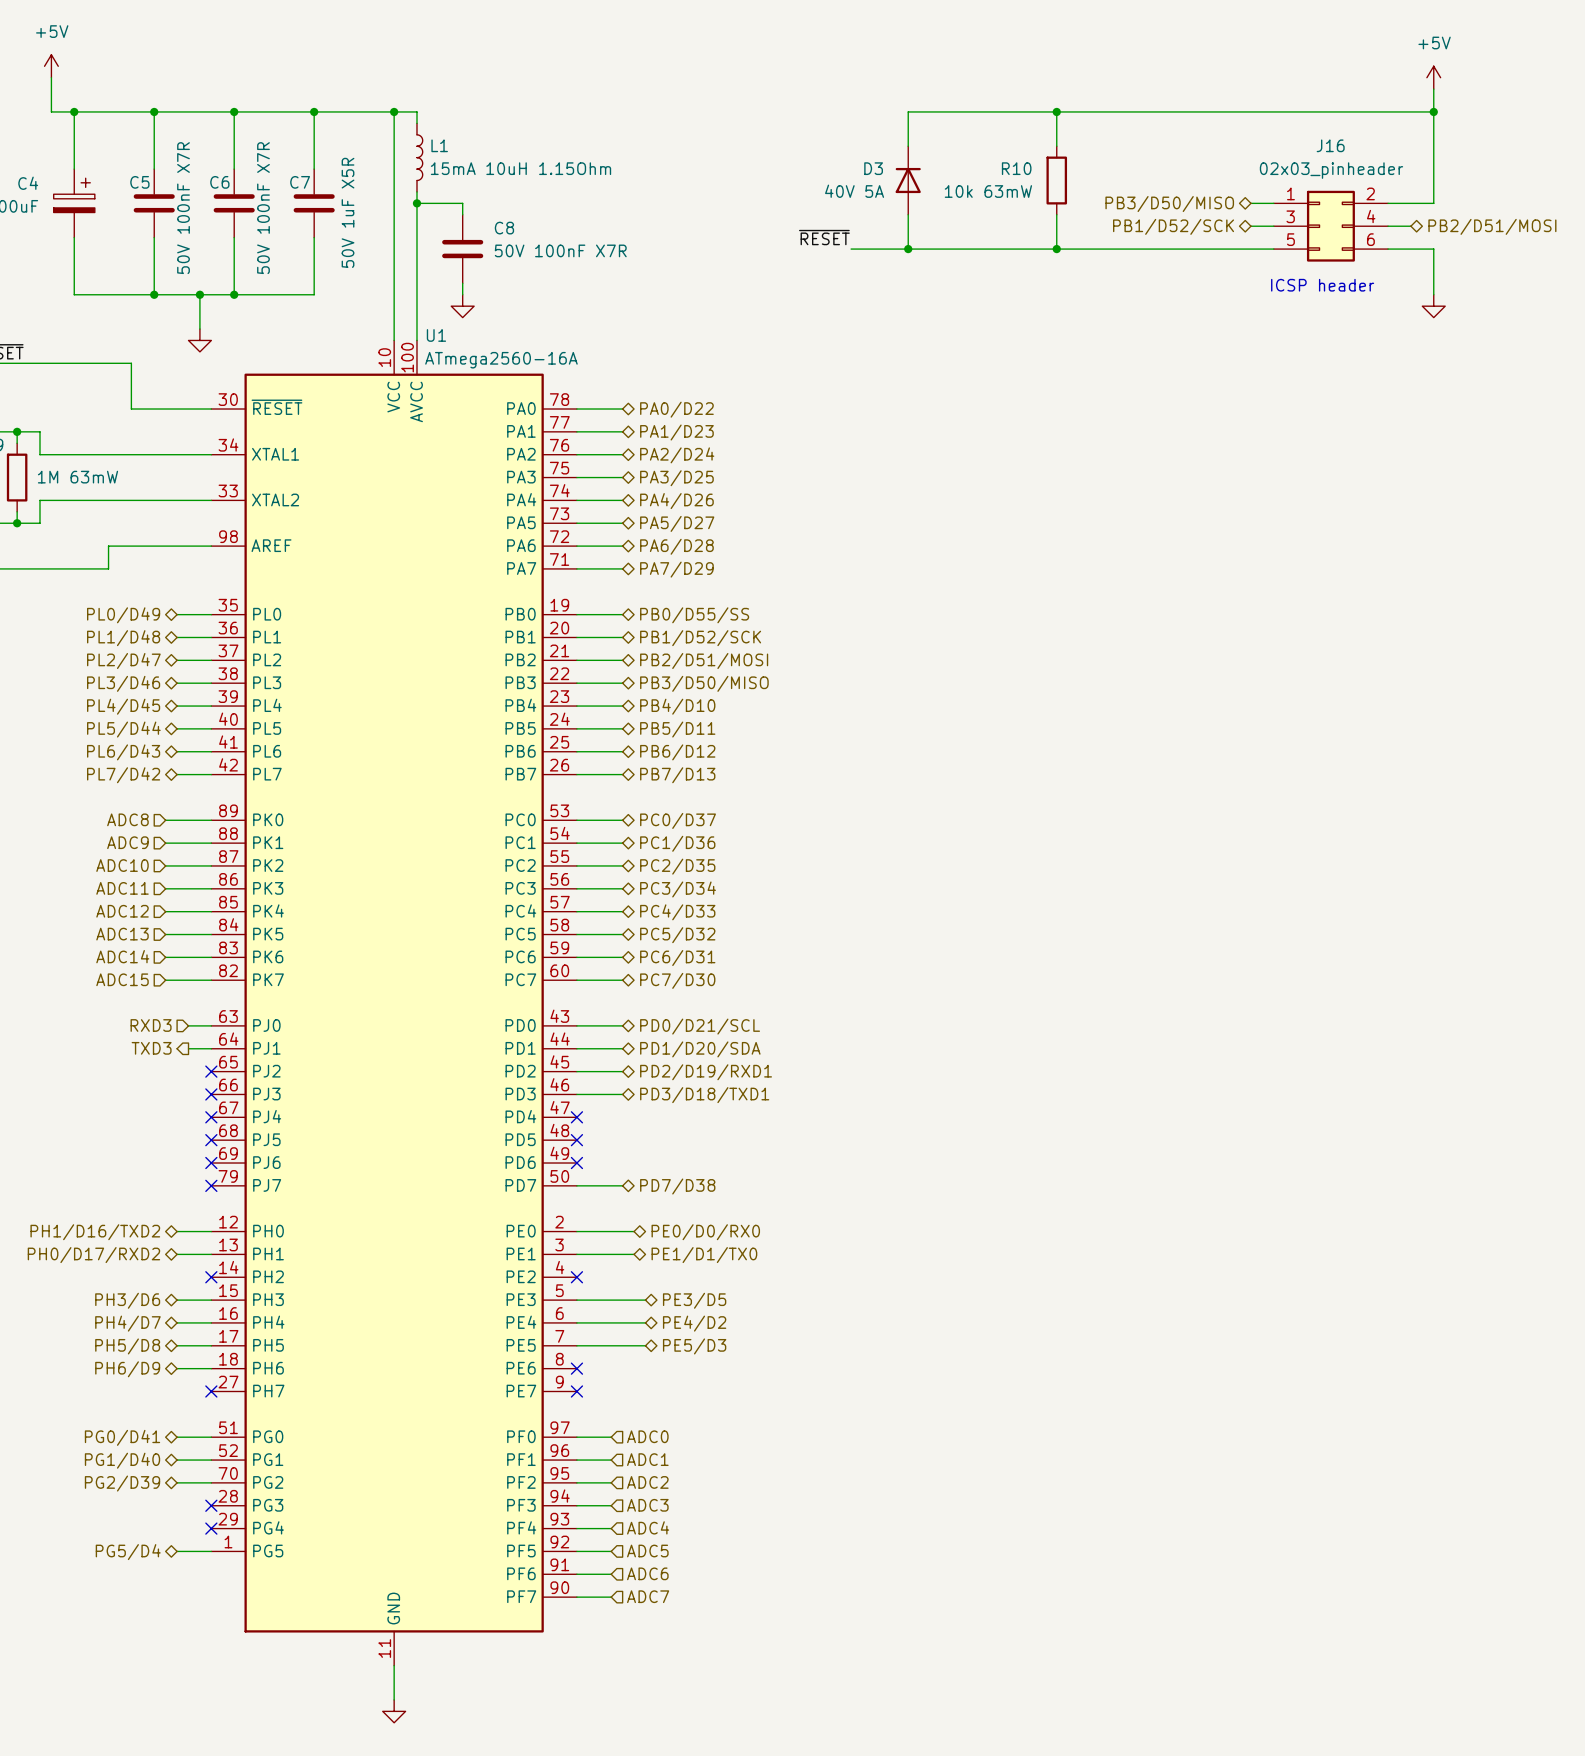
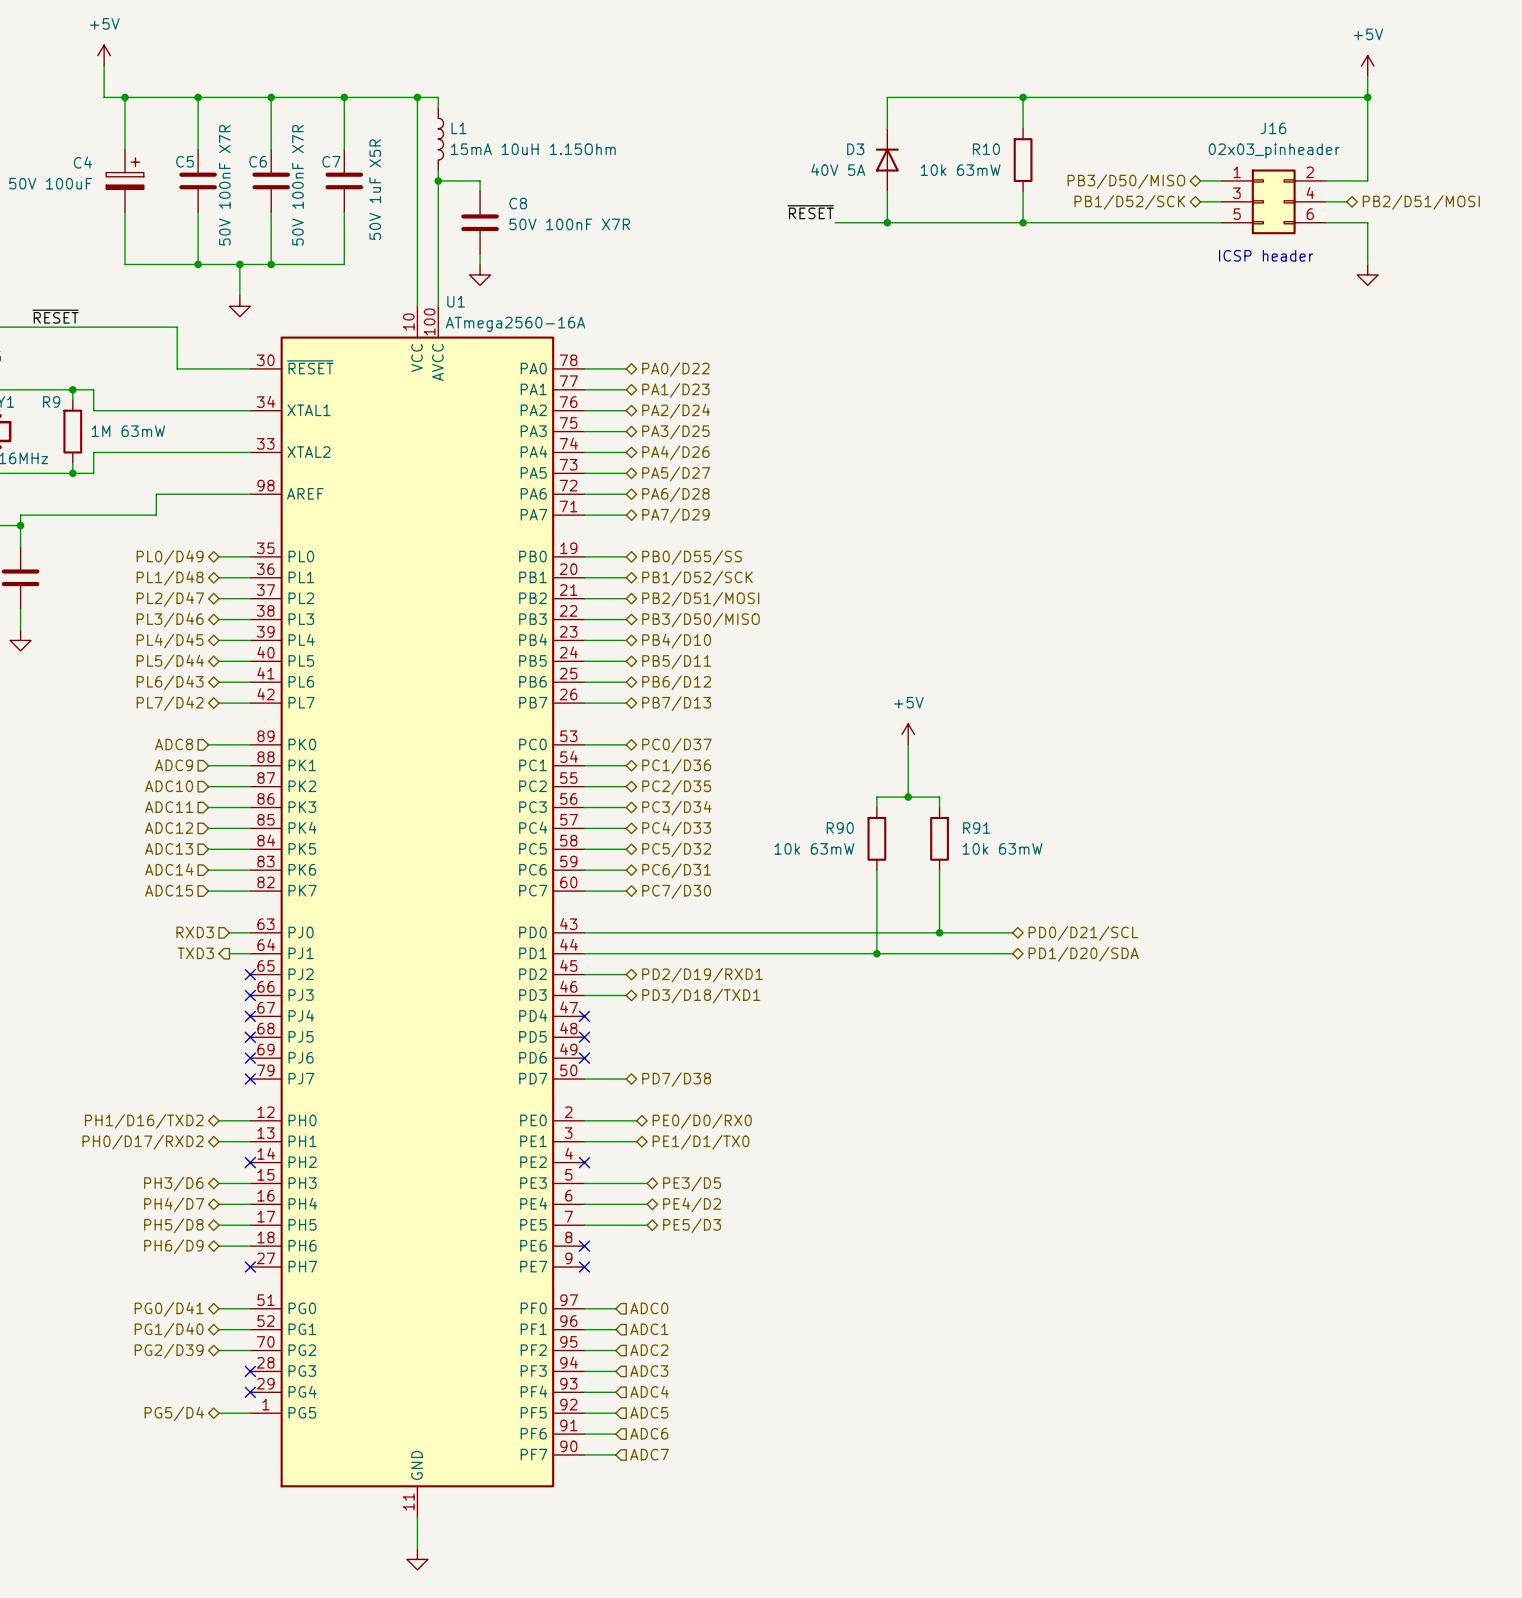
power symbol: none -> +5V (908, 734)
wire: none -> (908, 744) (908, 797)
junction: none -> (908, 797)
wire: none -> (876, 807) (876, 797) (939, 797) (939, 807)
R90: none -> 10k 63mW (876, 838)
R91: none -> 10k 63mW (939, 838)
wire: none -> (876, 870) (876, 953)
wire: none -> (939, 870) (939, 932)
wire: none -> (626, 932) (1012, 932)
junction: none -> (939, 932)
hierarchical label: PD0/D21/SCL (700, 1026) -> none
hierarchical label: none -> PD0/D21/SCL (1083, 933)
wire: none -> (626, 953) (1012, 953)
junction: none -> (876, 953)
hierarchical label: PD1/D20/SDA (700, 1049) -> none
hierarchical label: none -> PD1/D20/SDA (1083, 954)

